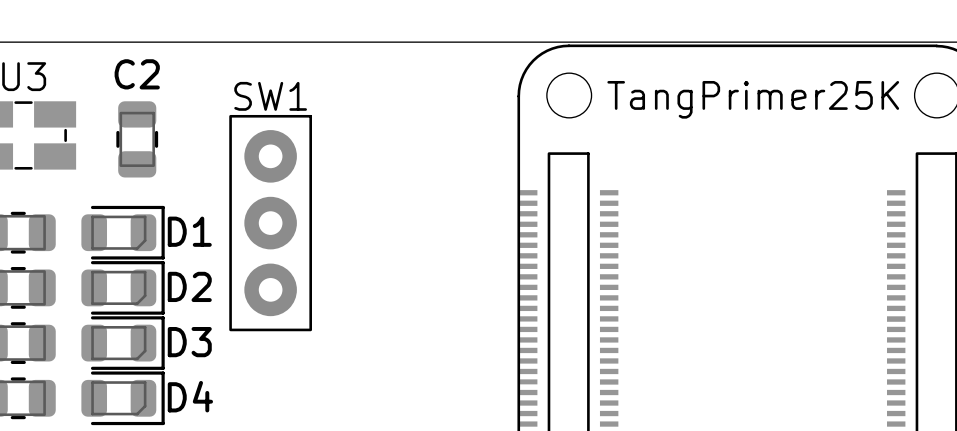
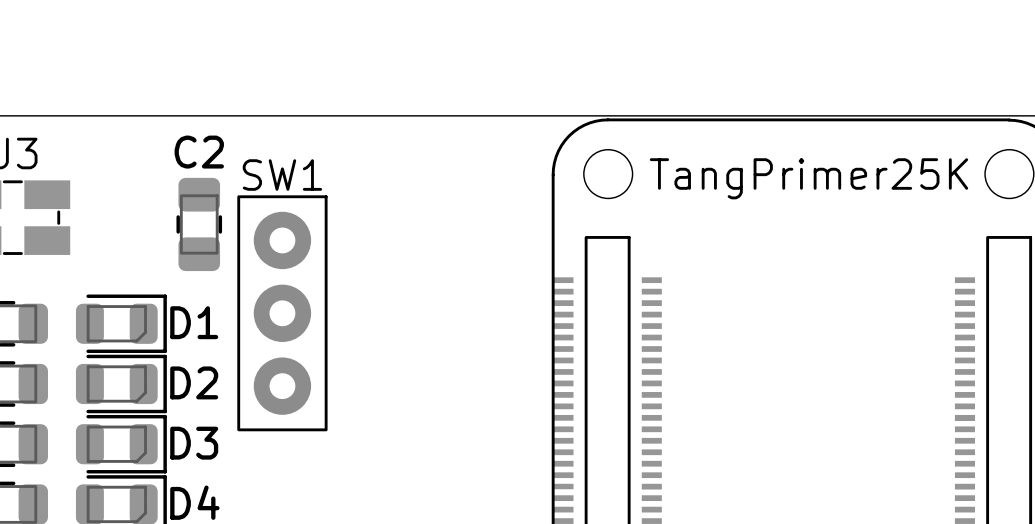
C2 footprint: [116, 101, 159, 178] -> [176, 177, 223, 272]

